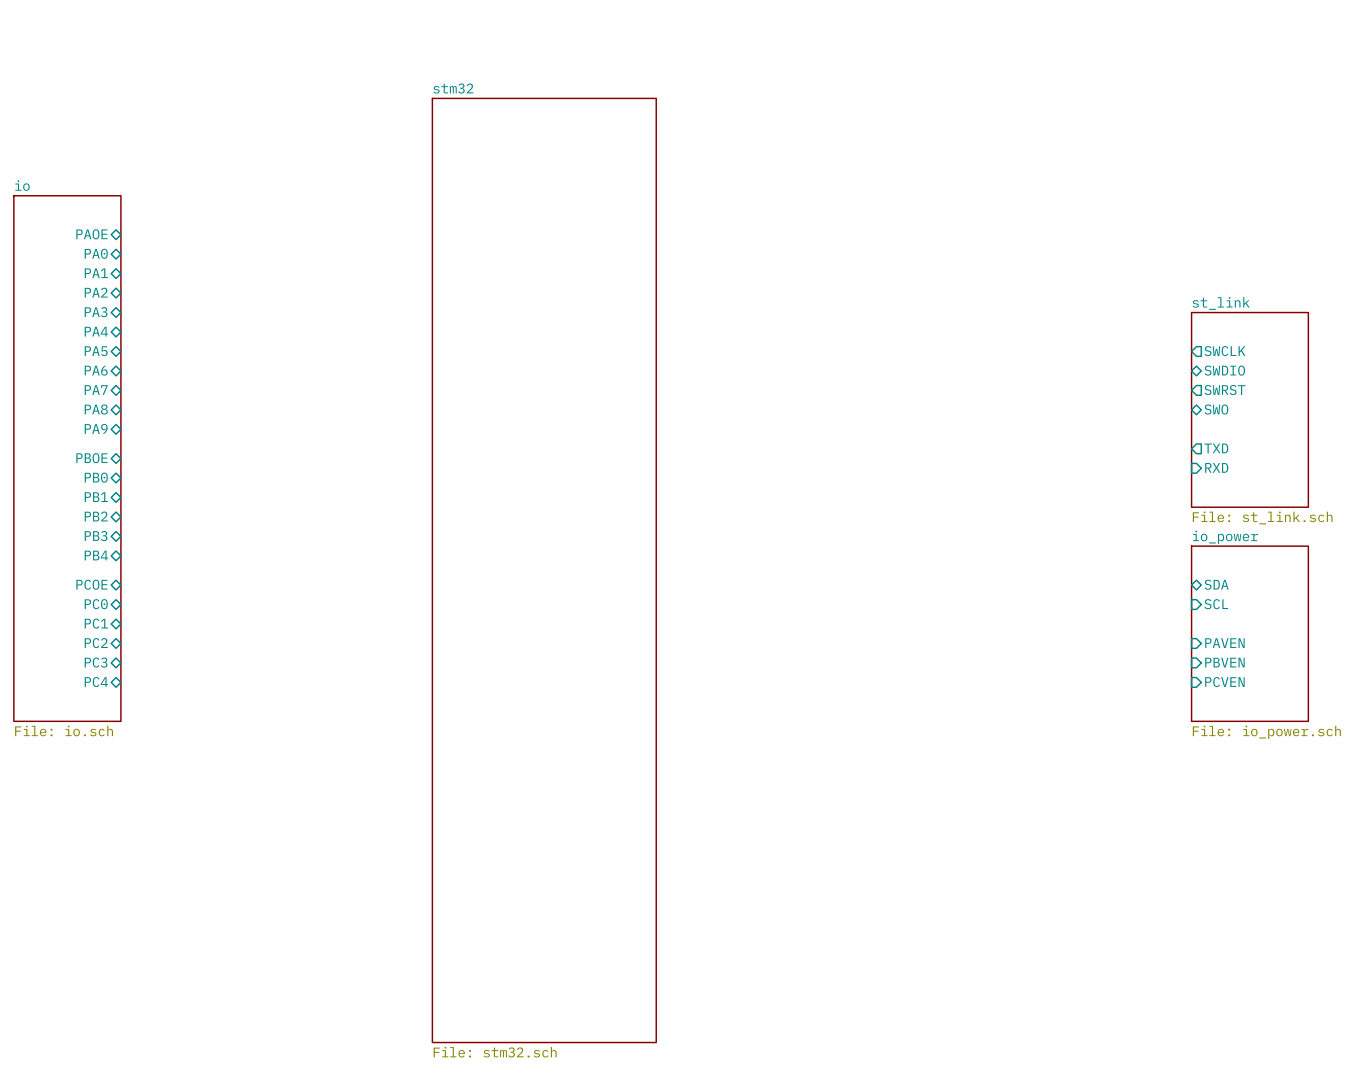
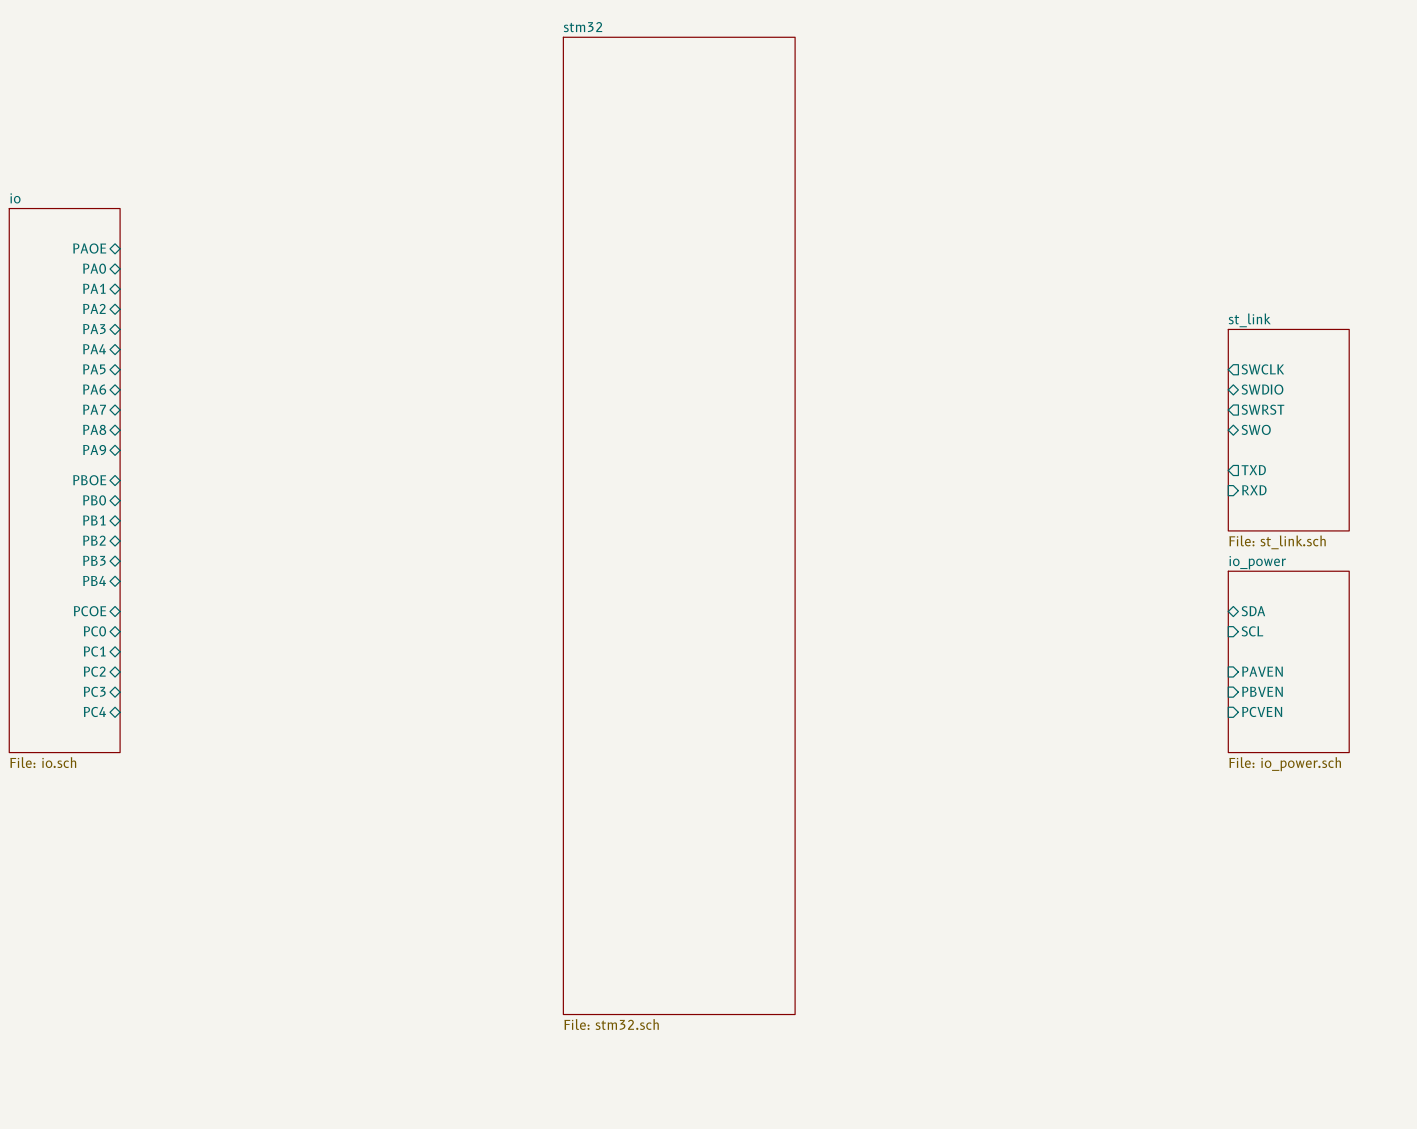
sheet stm32 position: (544, 570) -> (679, 525)

